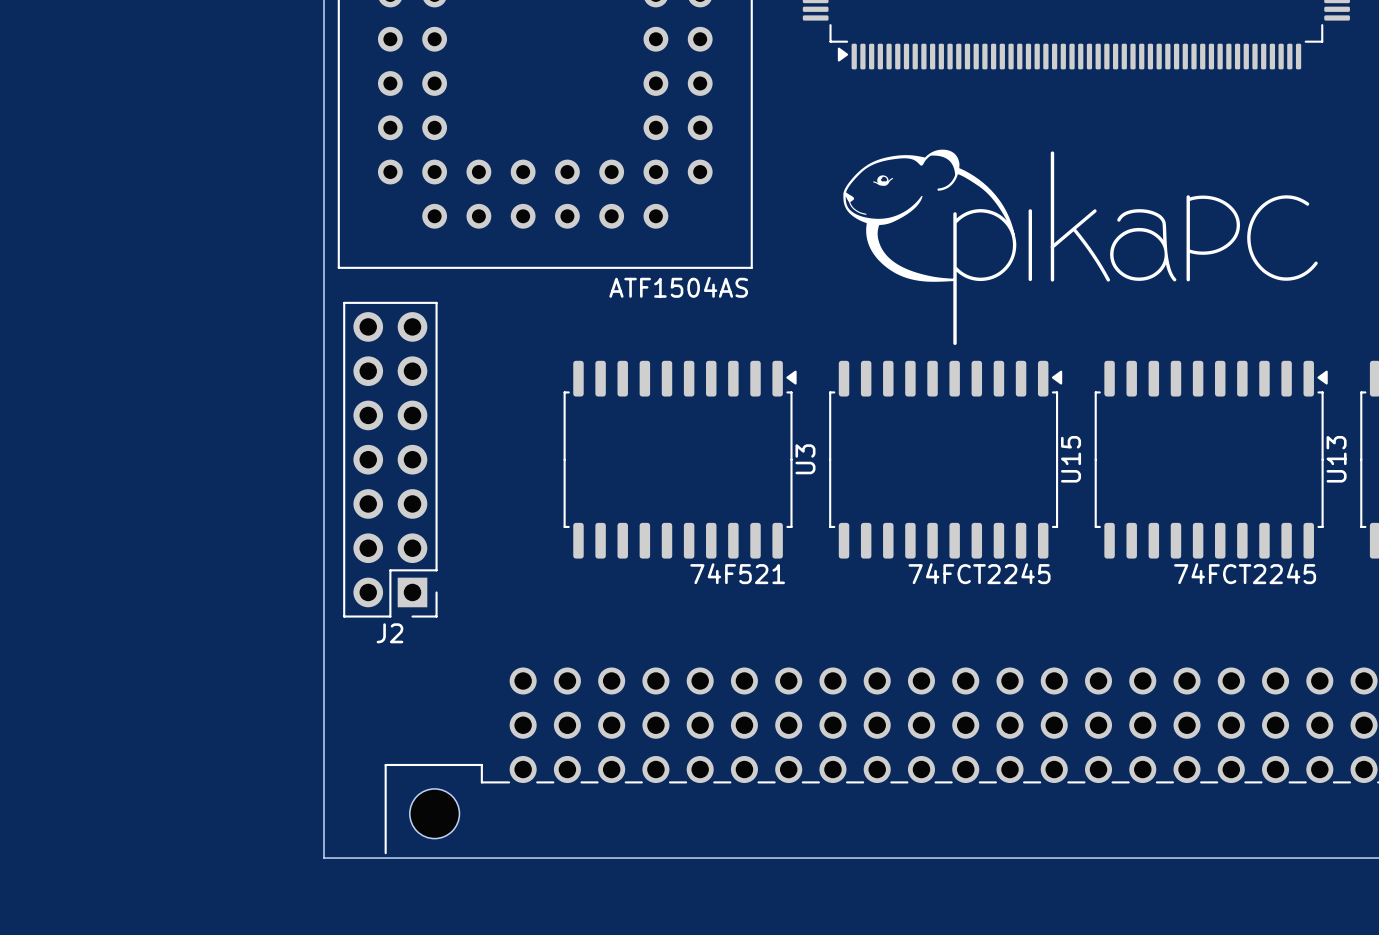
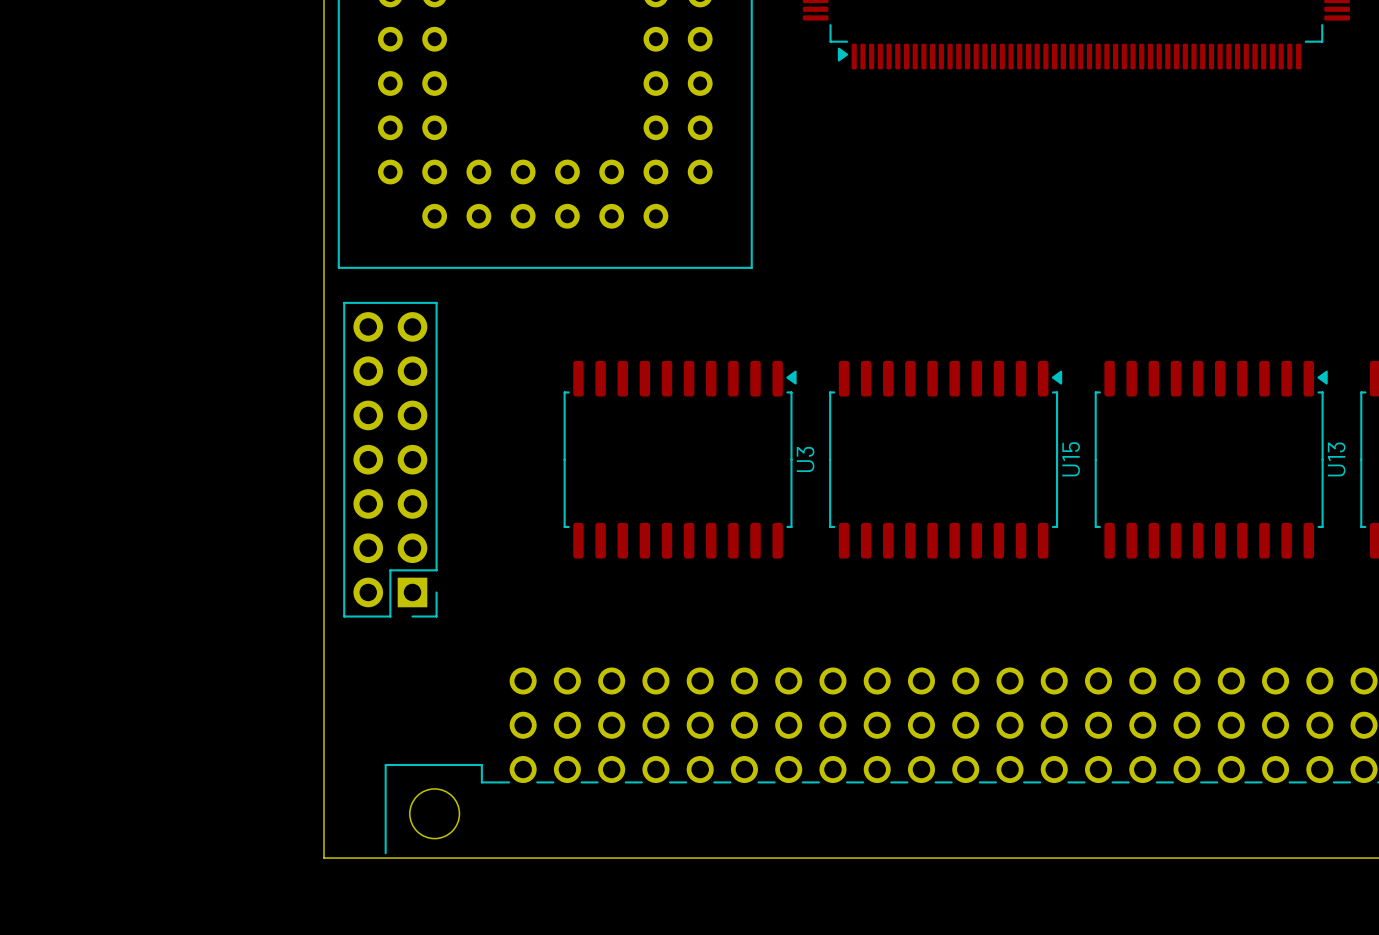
drawing: [843, 149, 1318, 345] -> none
part value: ATF1504AS (678, 287) -> none
U3 value: 74F521 (737, 573) -> none
U15 value: 74FCT2245 (979, 573) -> none
U13 value: 74FCT2245 (1245, 573) -> none
J2 name: J2 (389, 633) -> none

